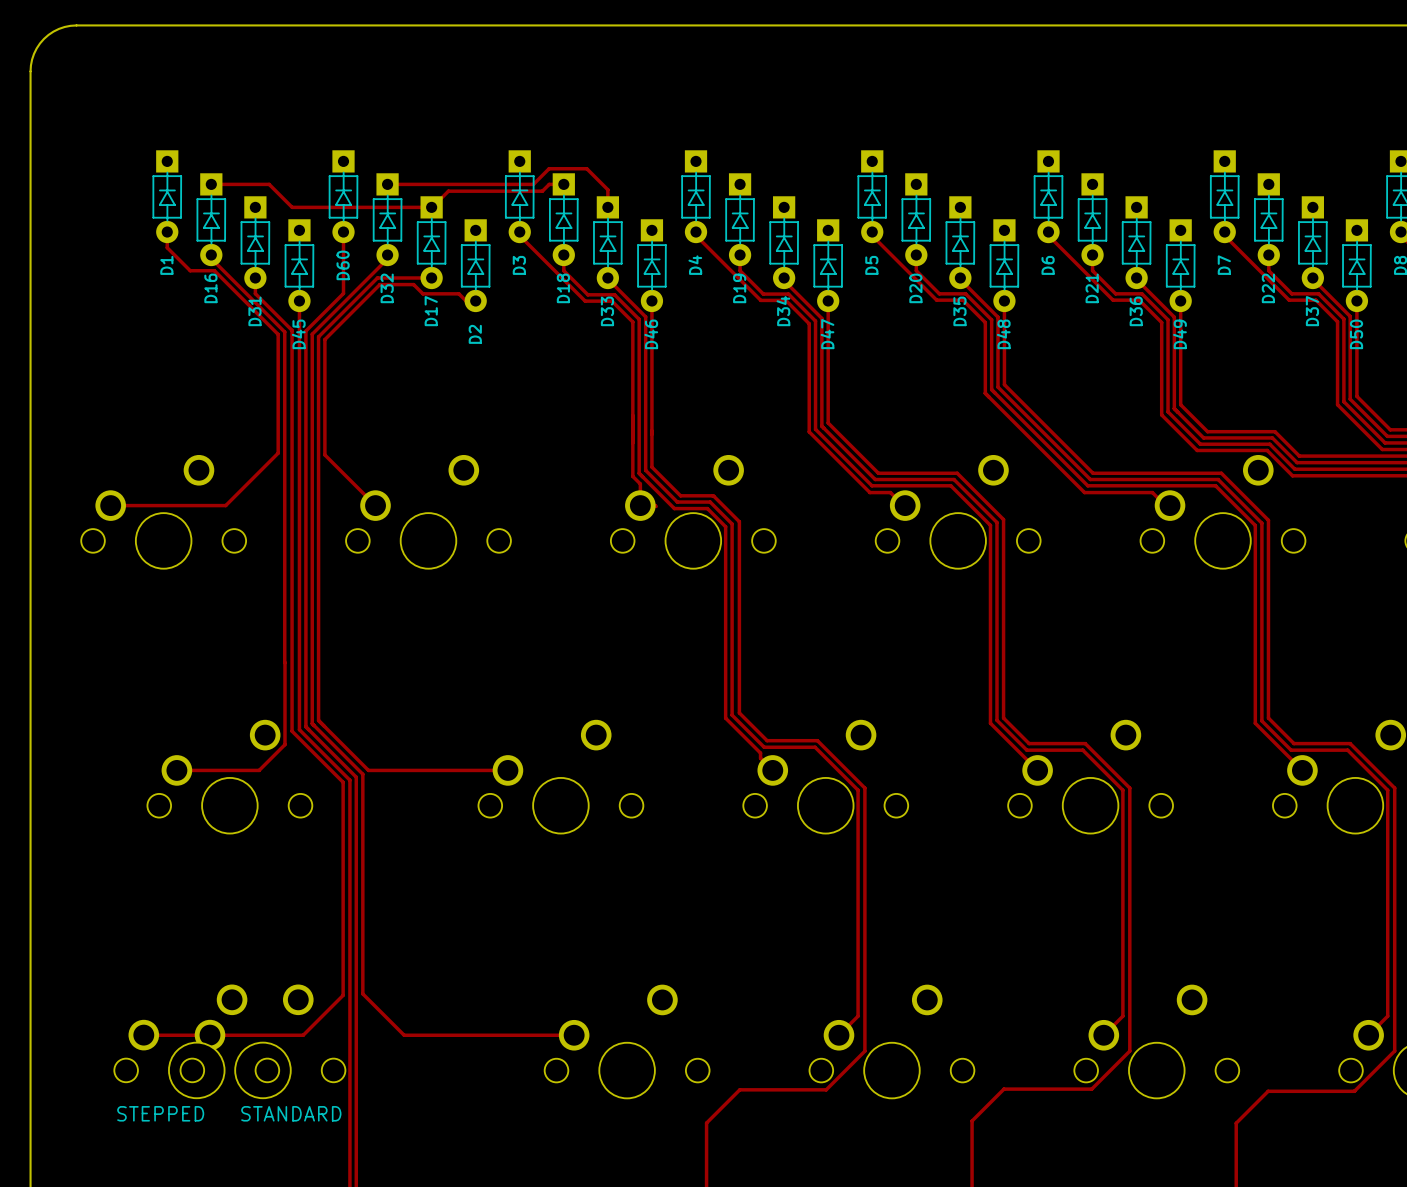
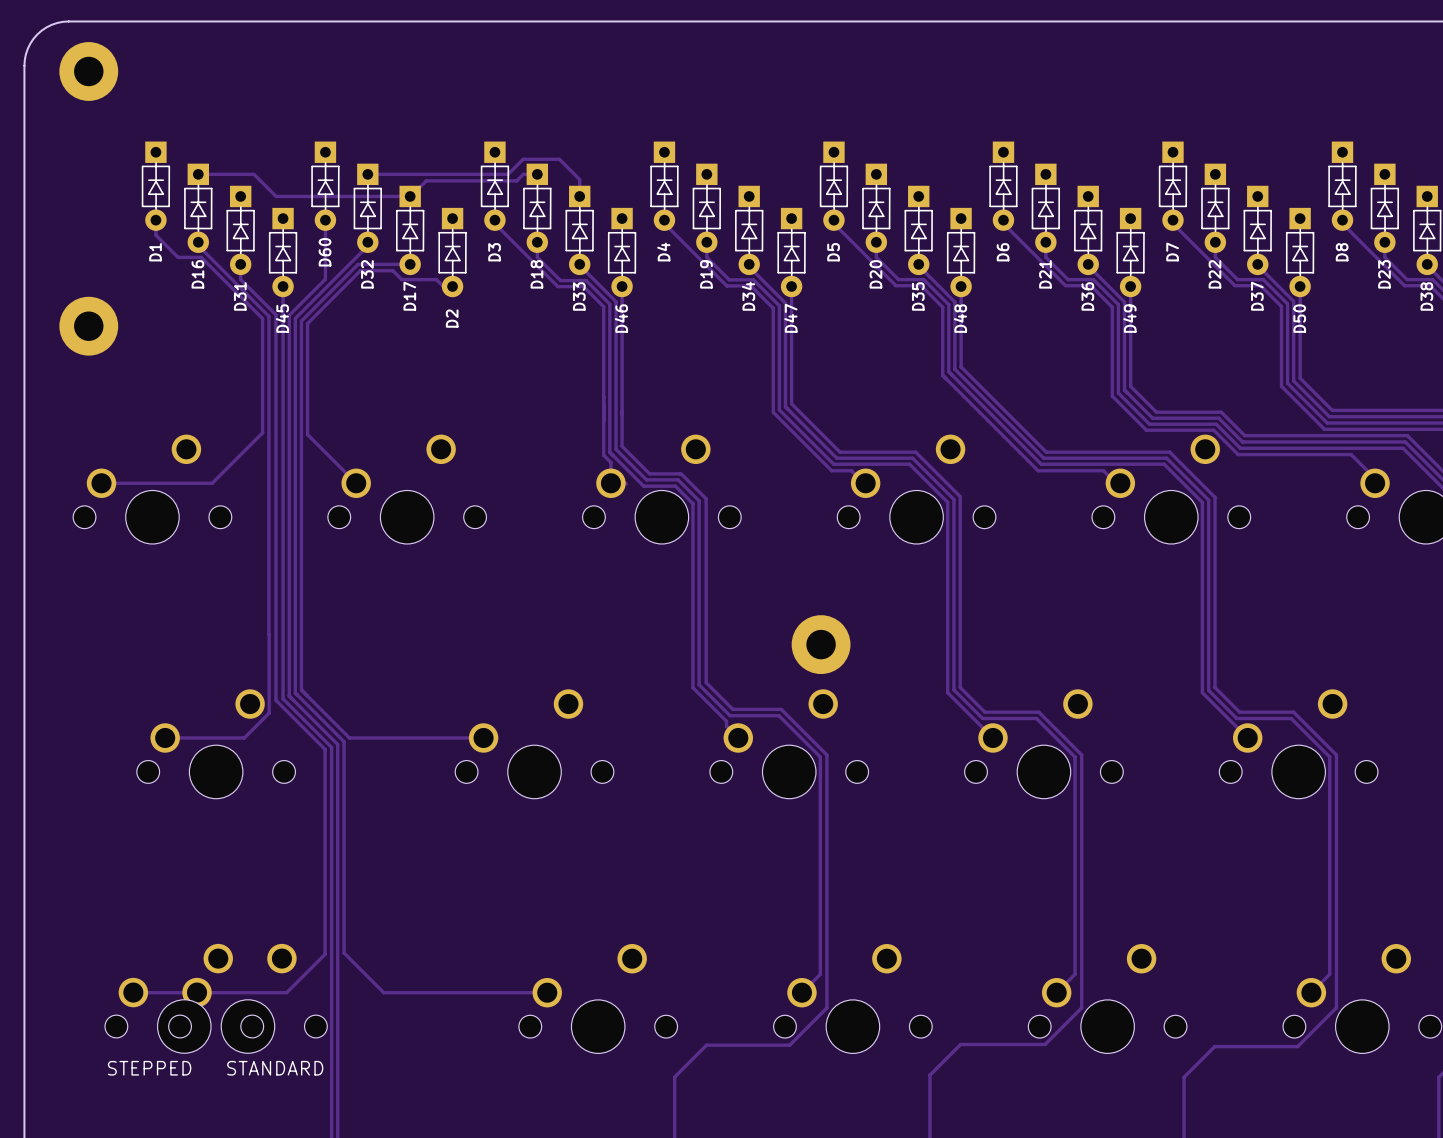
part: none -> (88, 71)
part: none -> (88, 326)
part: none -> (821, 644)

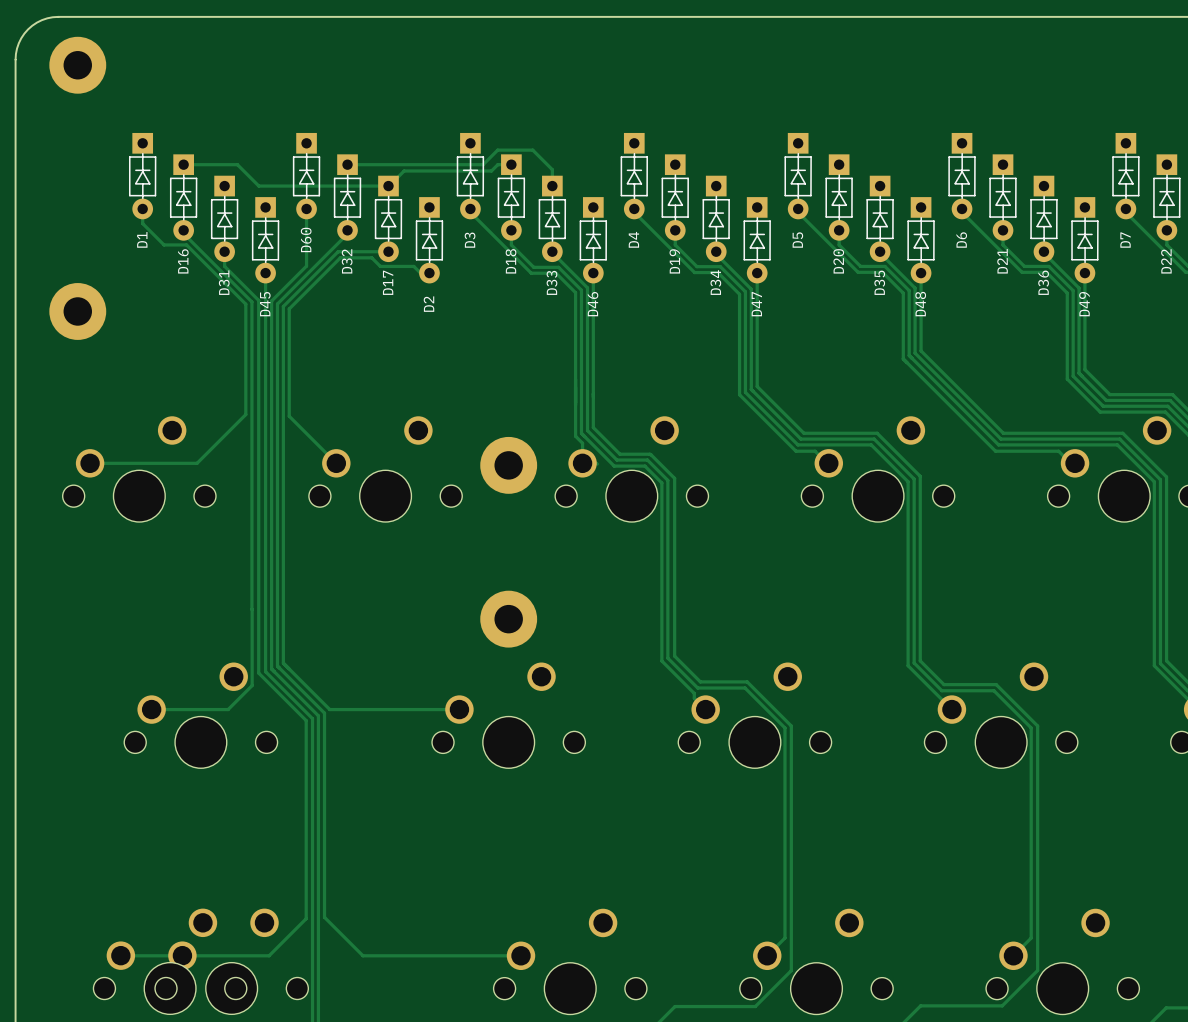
part: none -> (508, 465)
part: none -> (508, 619)
part: (821, 644) -> none

